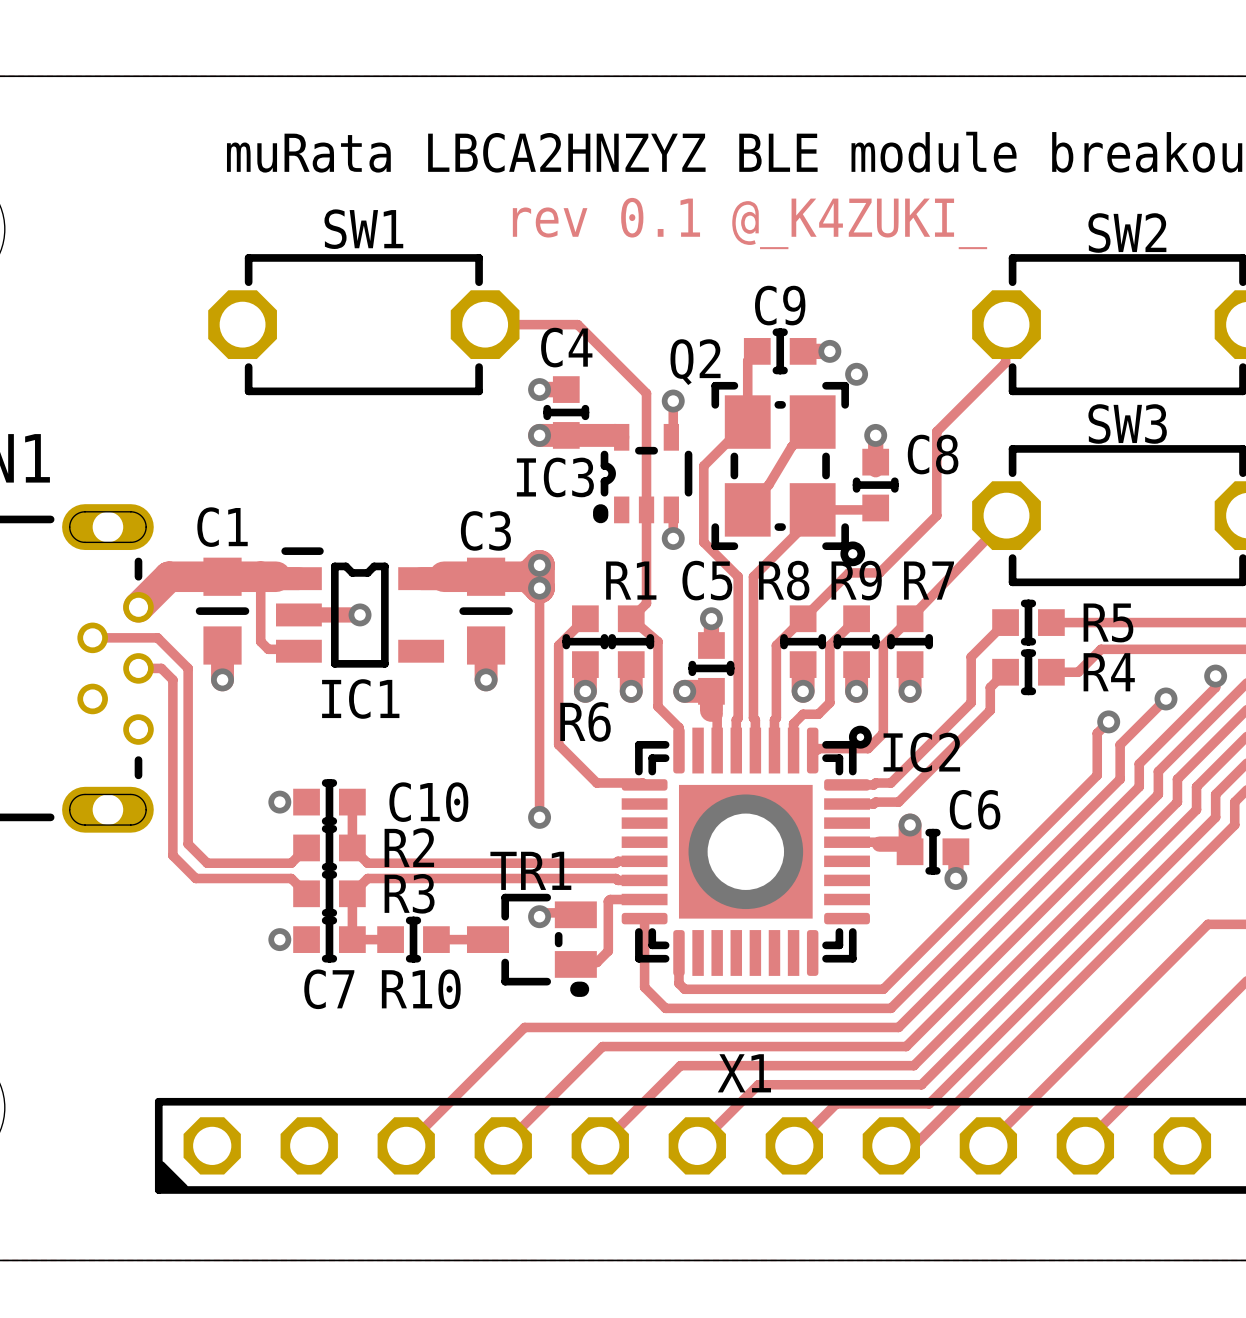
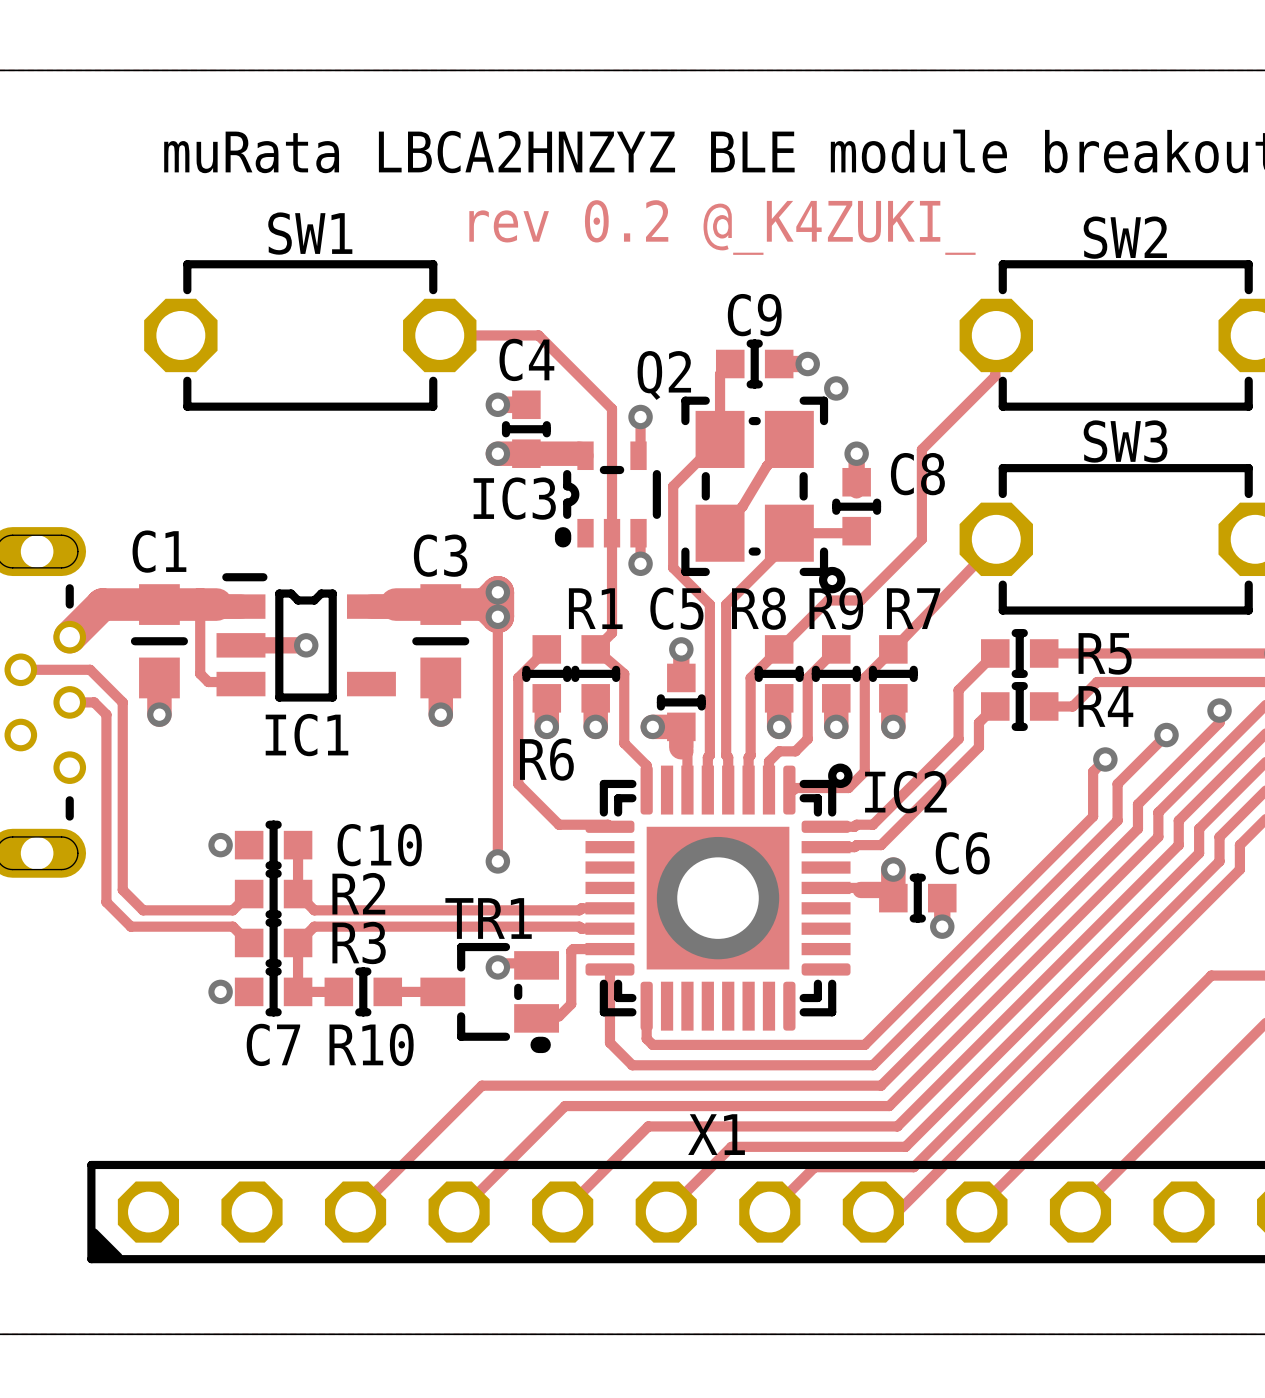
text: rev 0.1 @_K4ZUKI_ (749, 223) -> rev 0.2 @_K4ZUKI_ (722, 227)

